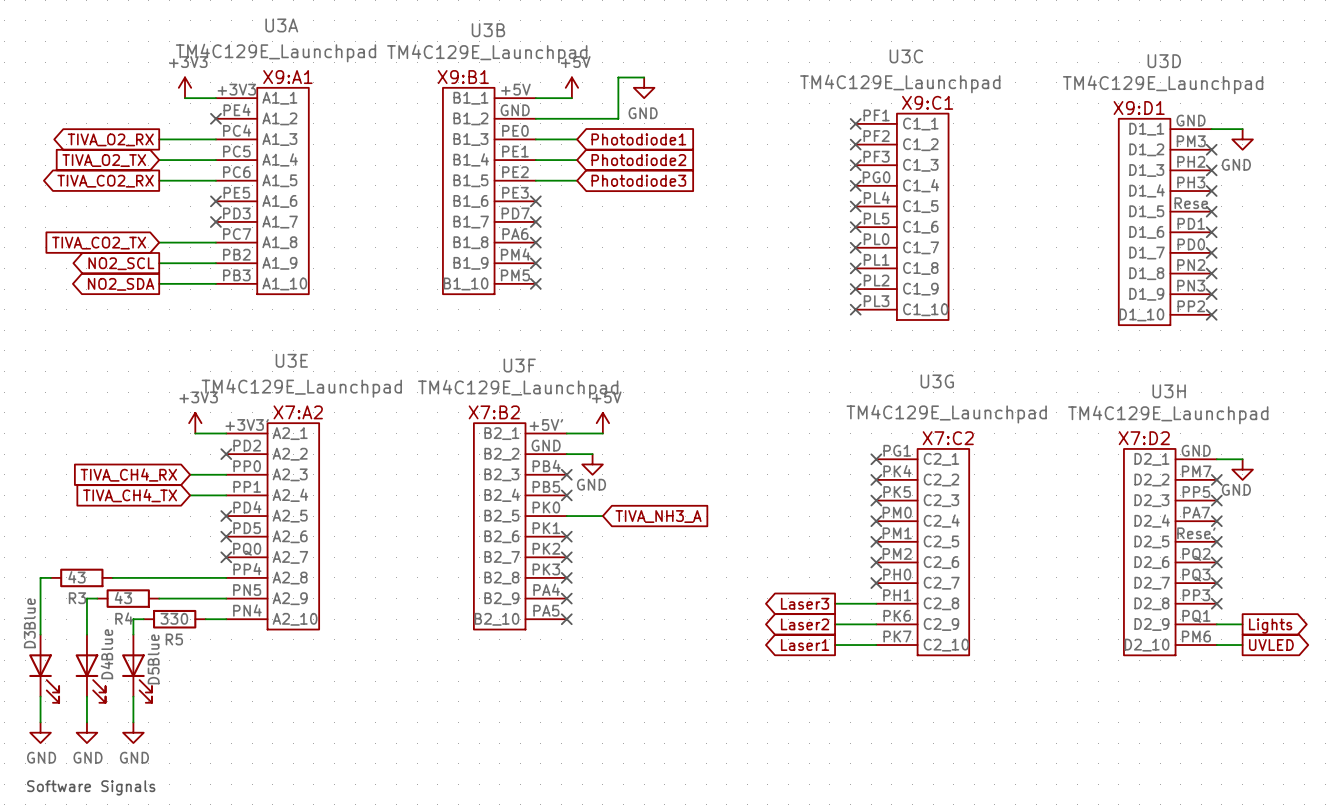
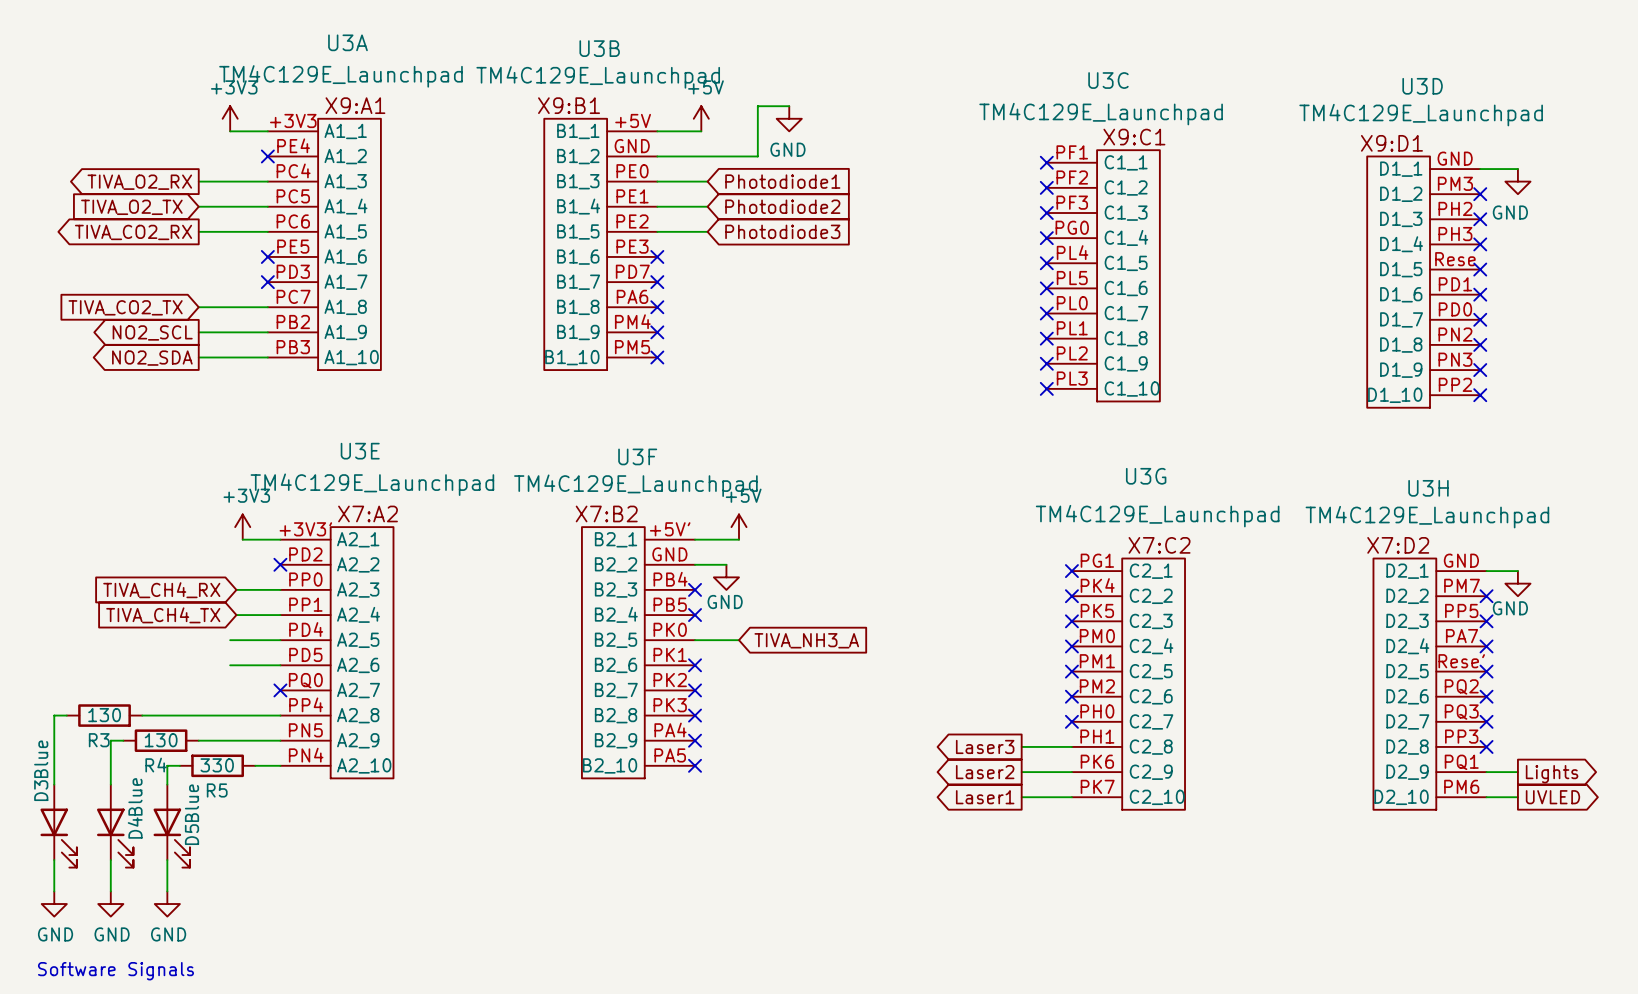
wire: none -> (230, 640) (280, 640)
no-connect mark: (226, 516) -> none
wire: none -> (230, 665) (280, 665)
no-connect mark: (226, 536) -> none
R3 value: 43 (76, 577) -> 130 (104, 715)
R4 value: 43 (123, 597) -> 130 (161, 740)

